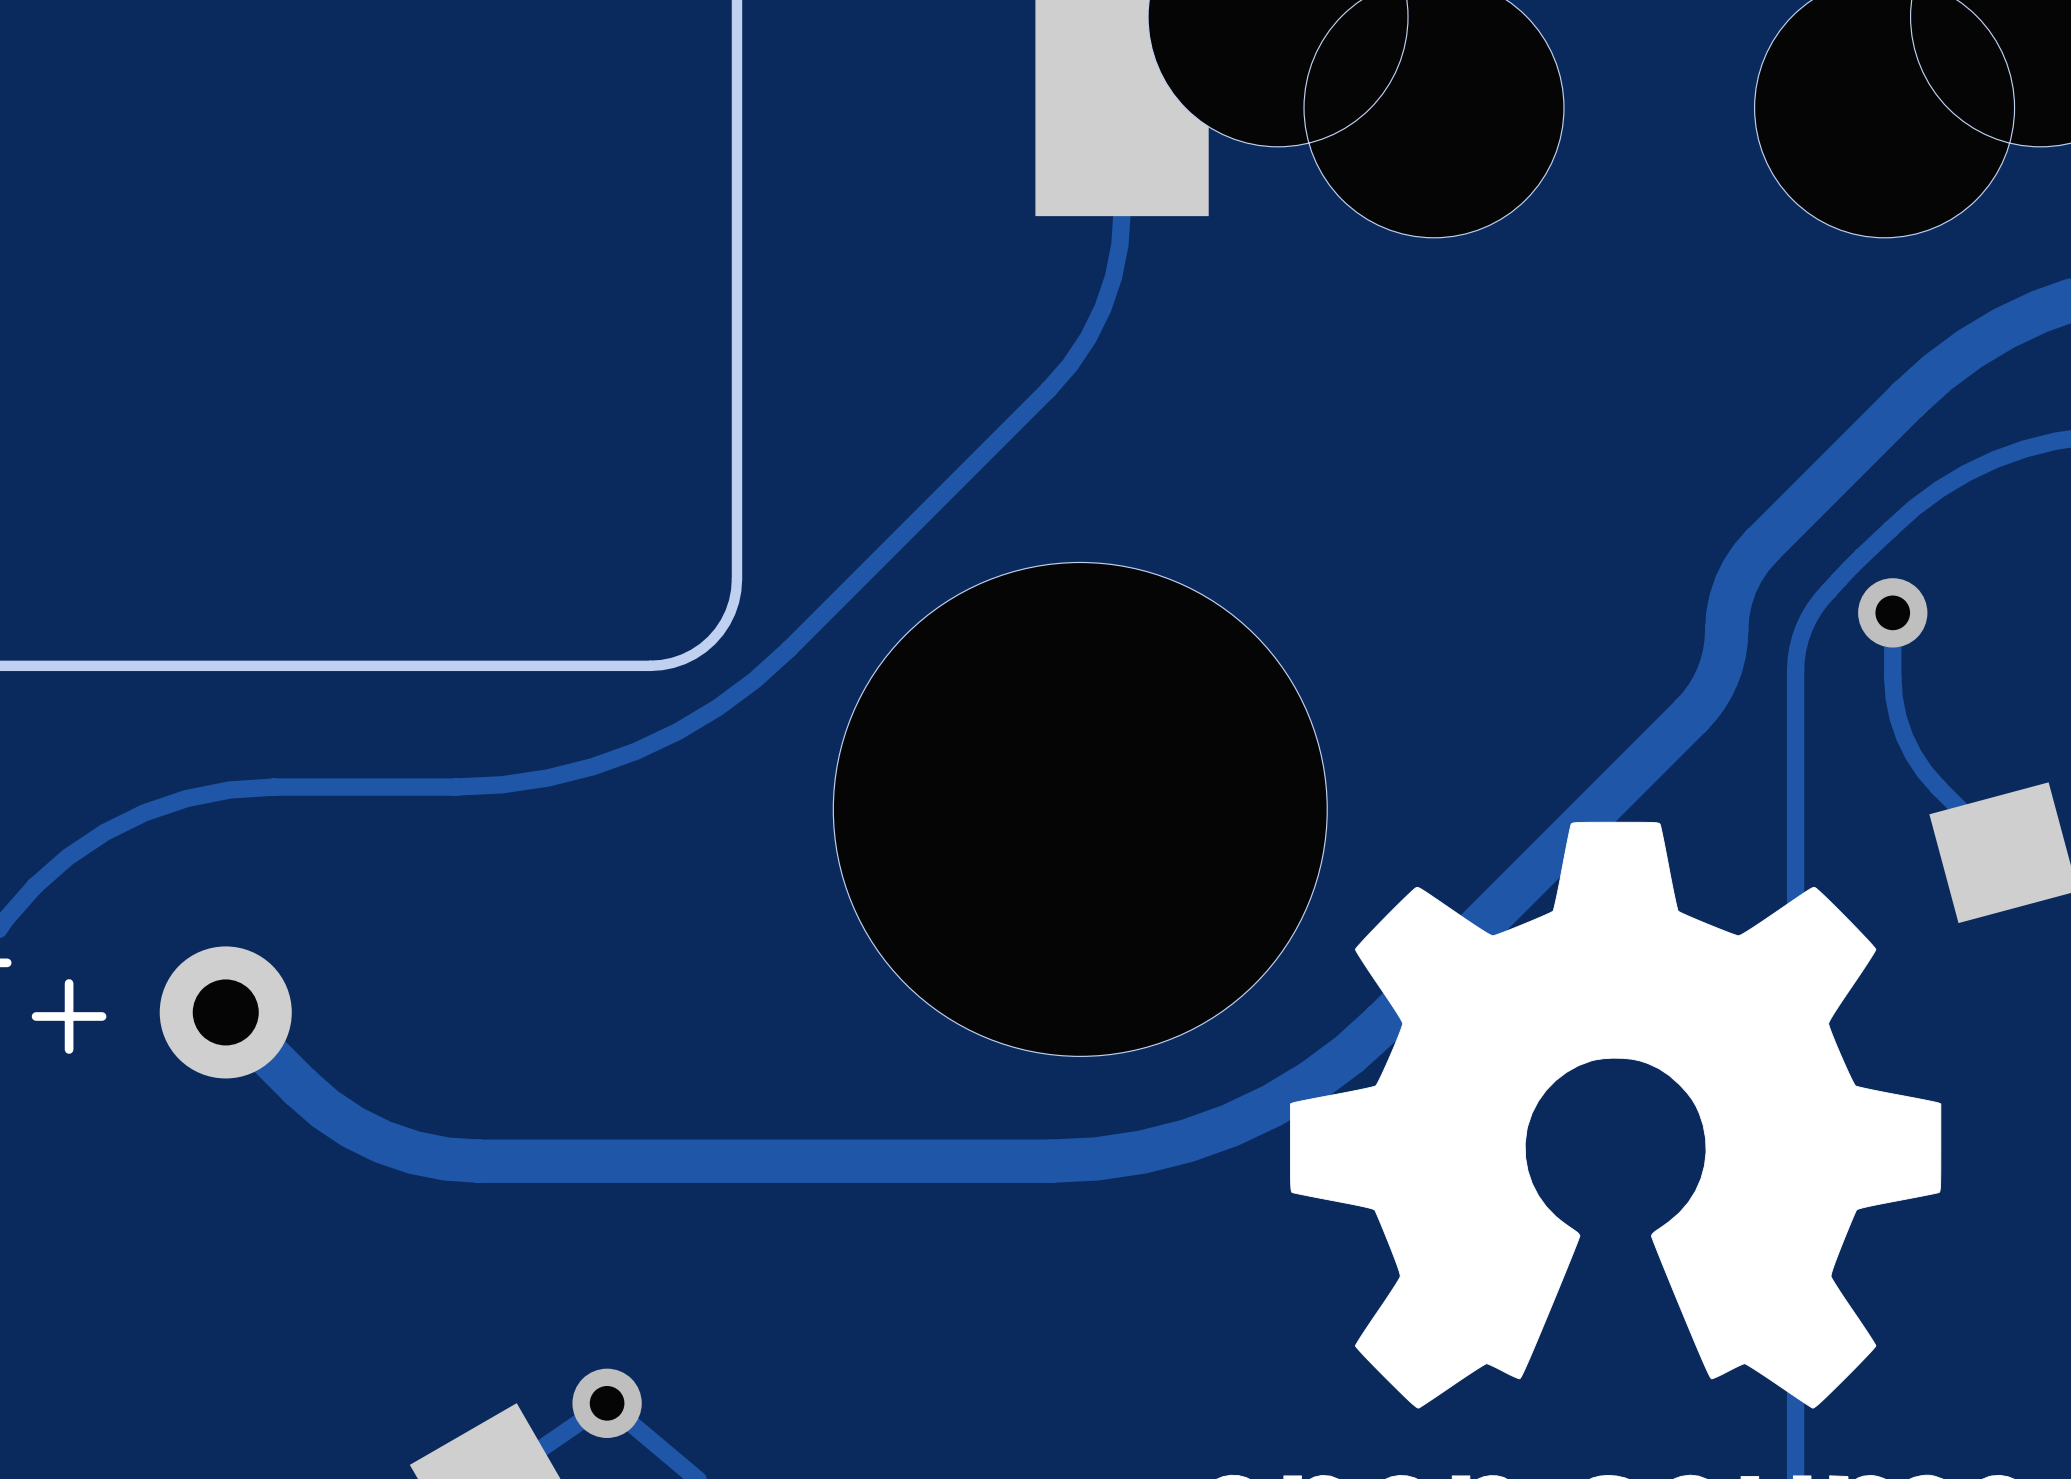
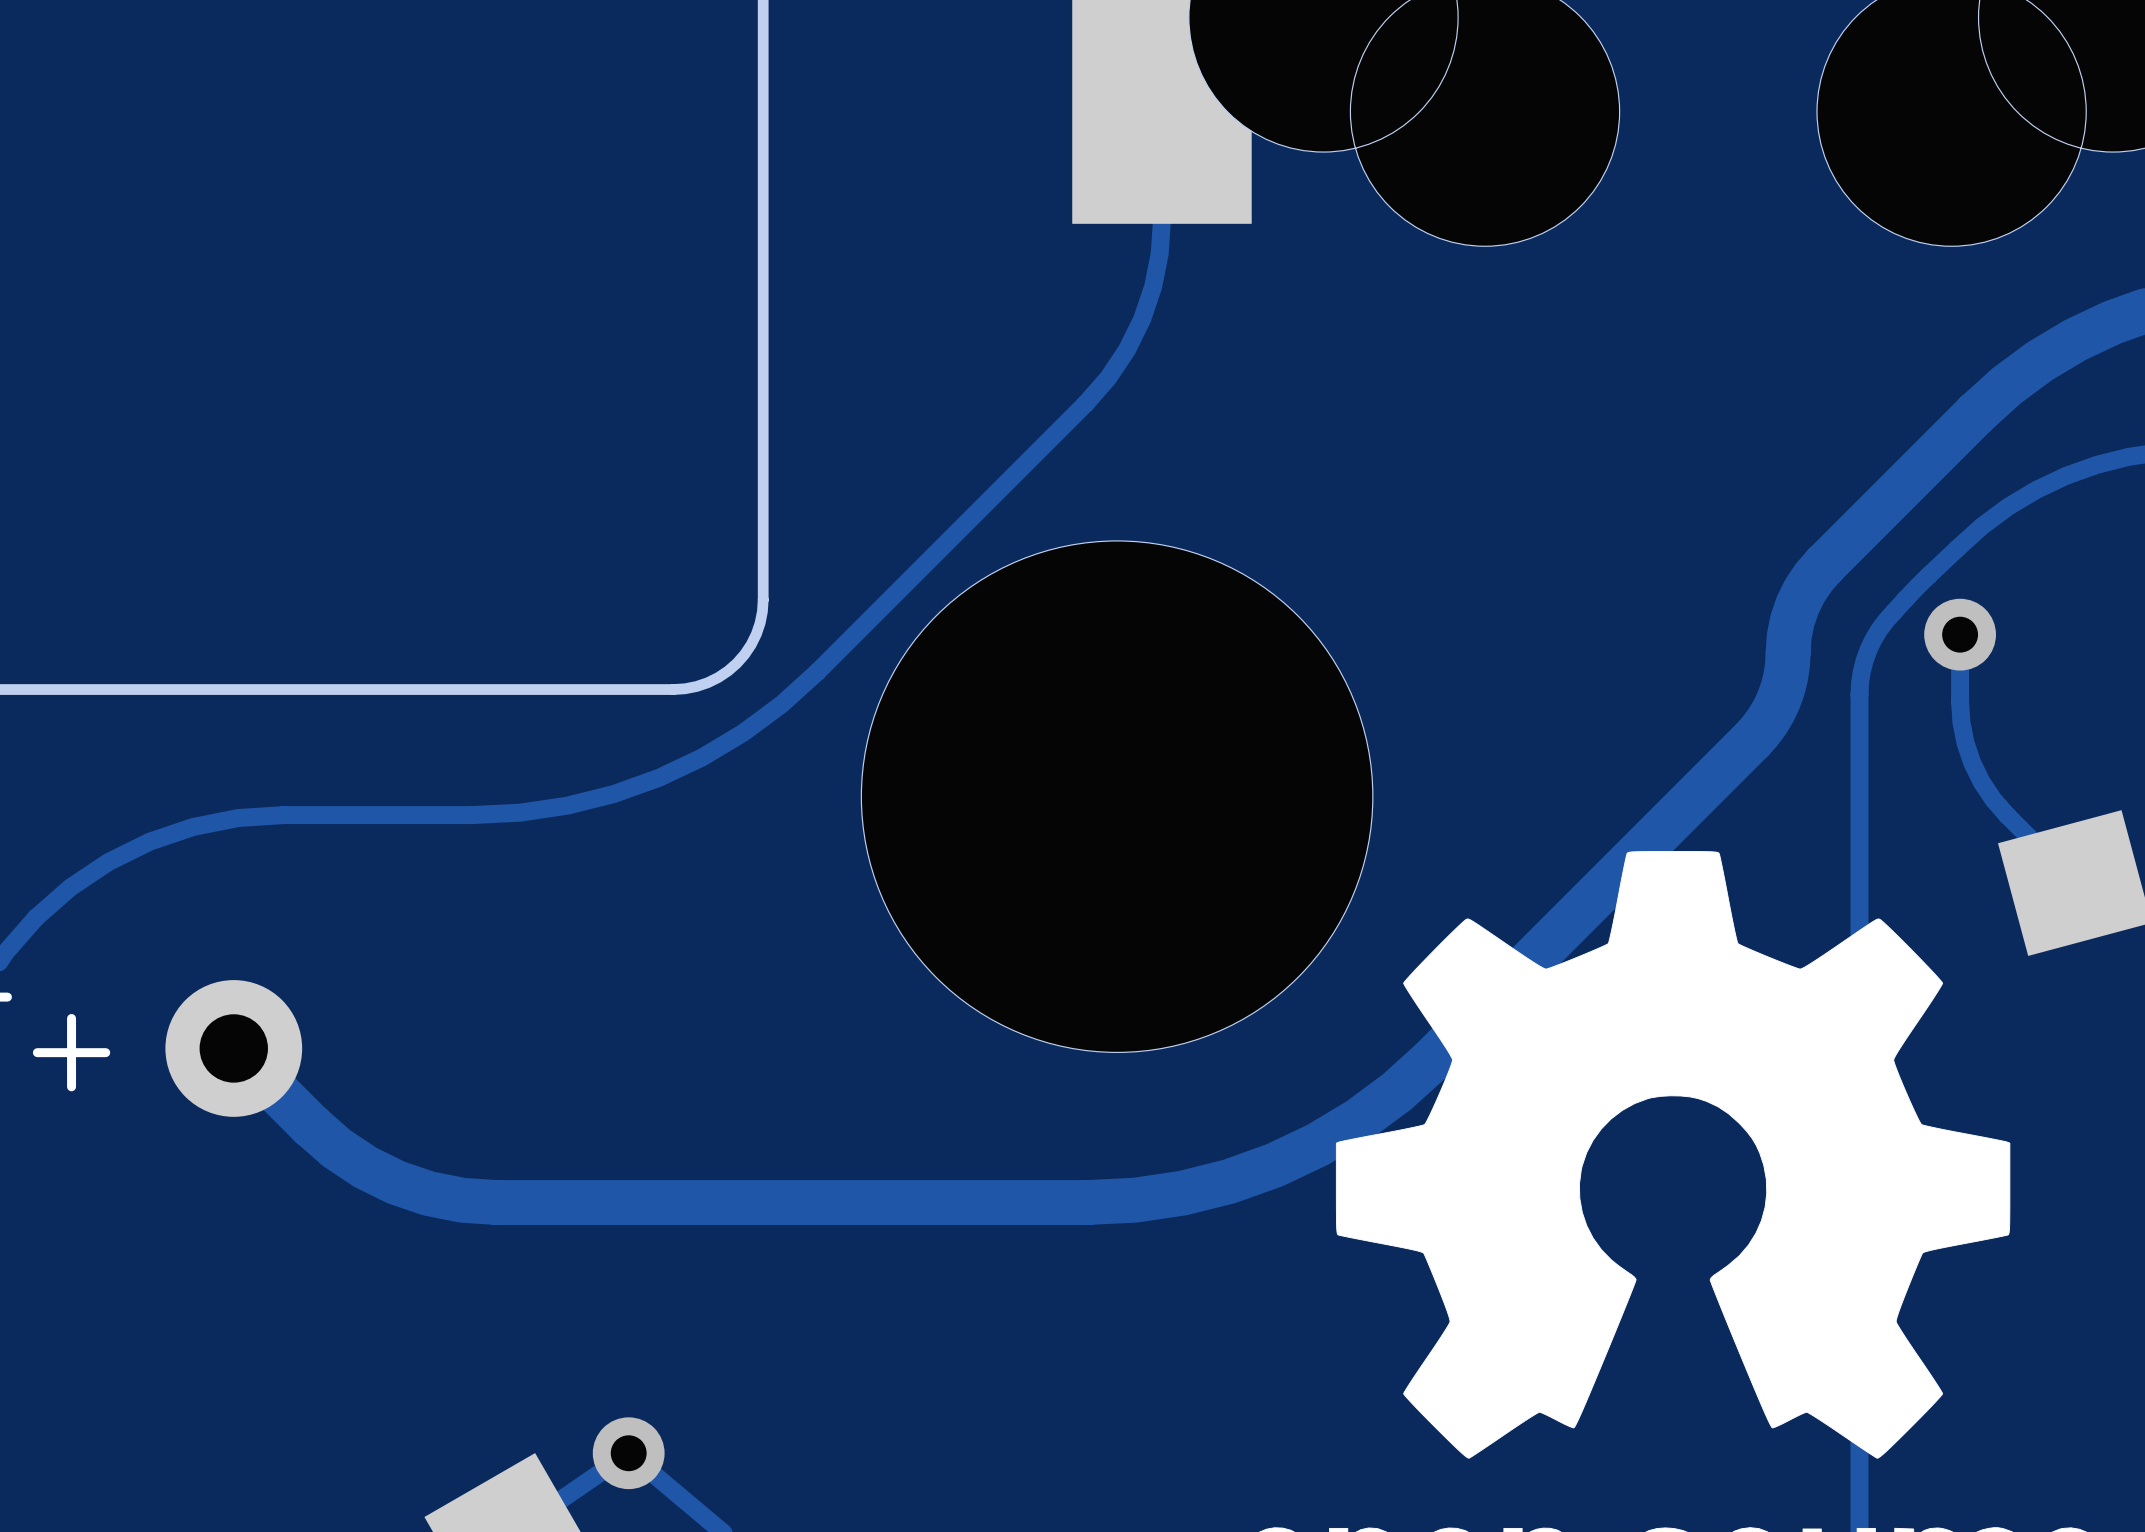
part position: (1080, 809) -> (1117, 796)

